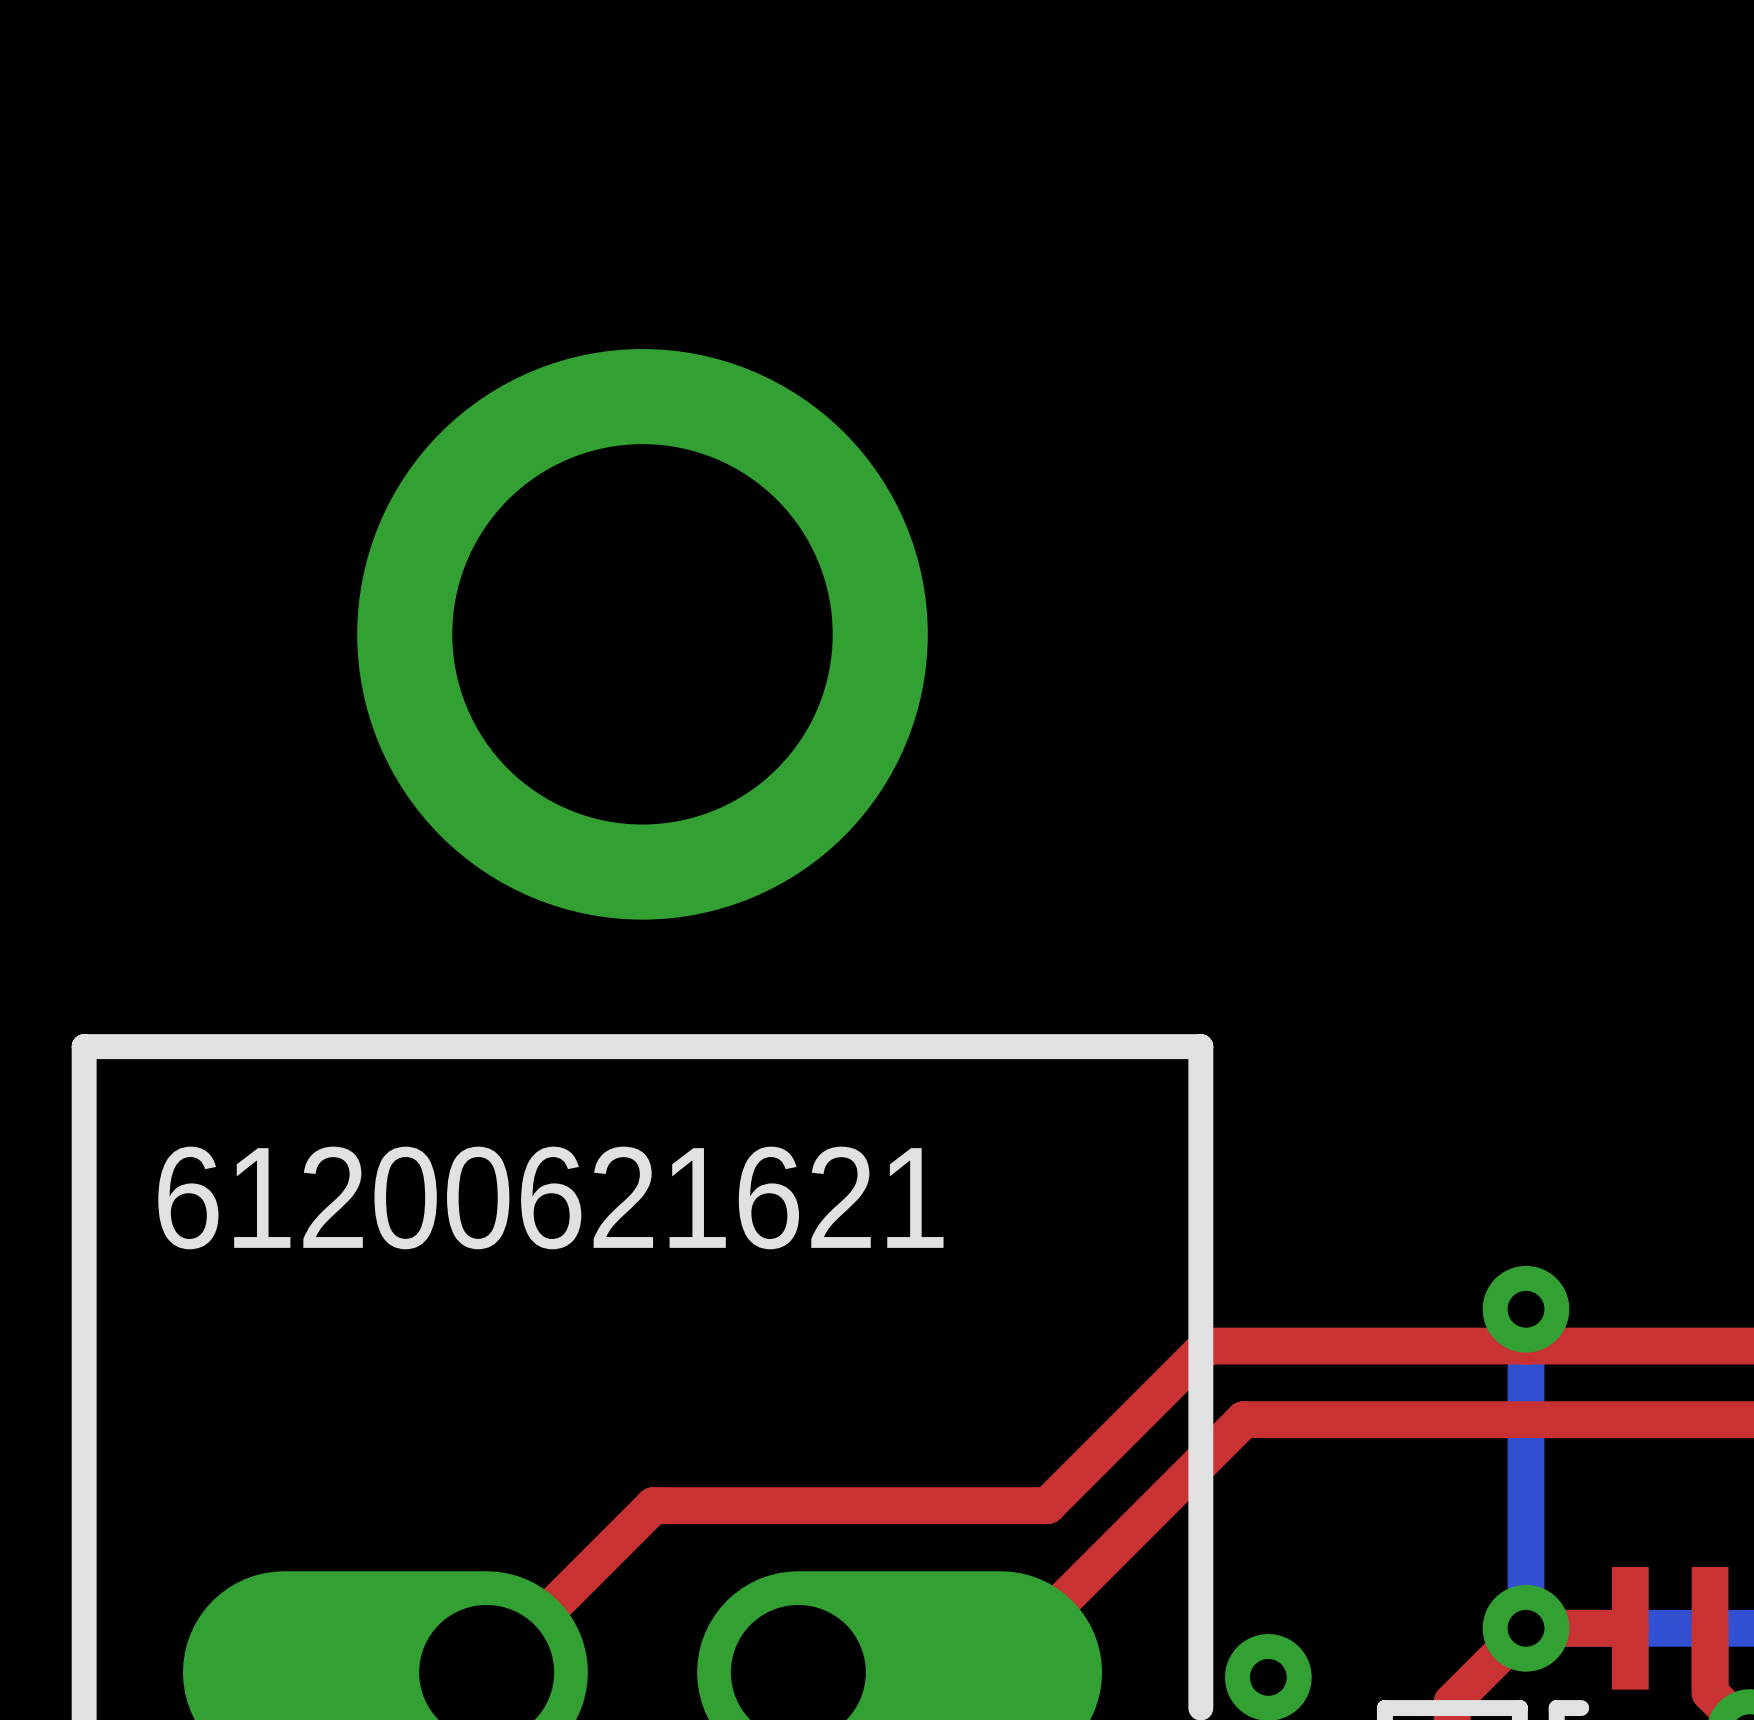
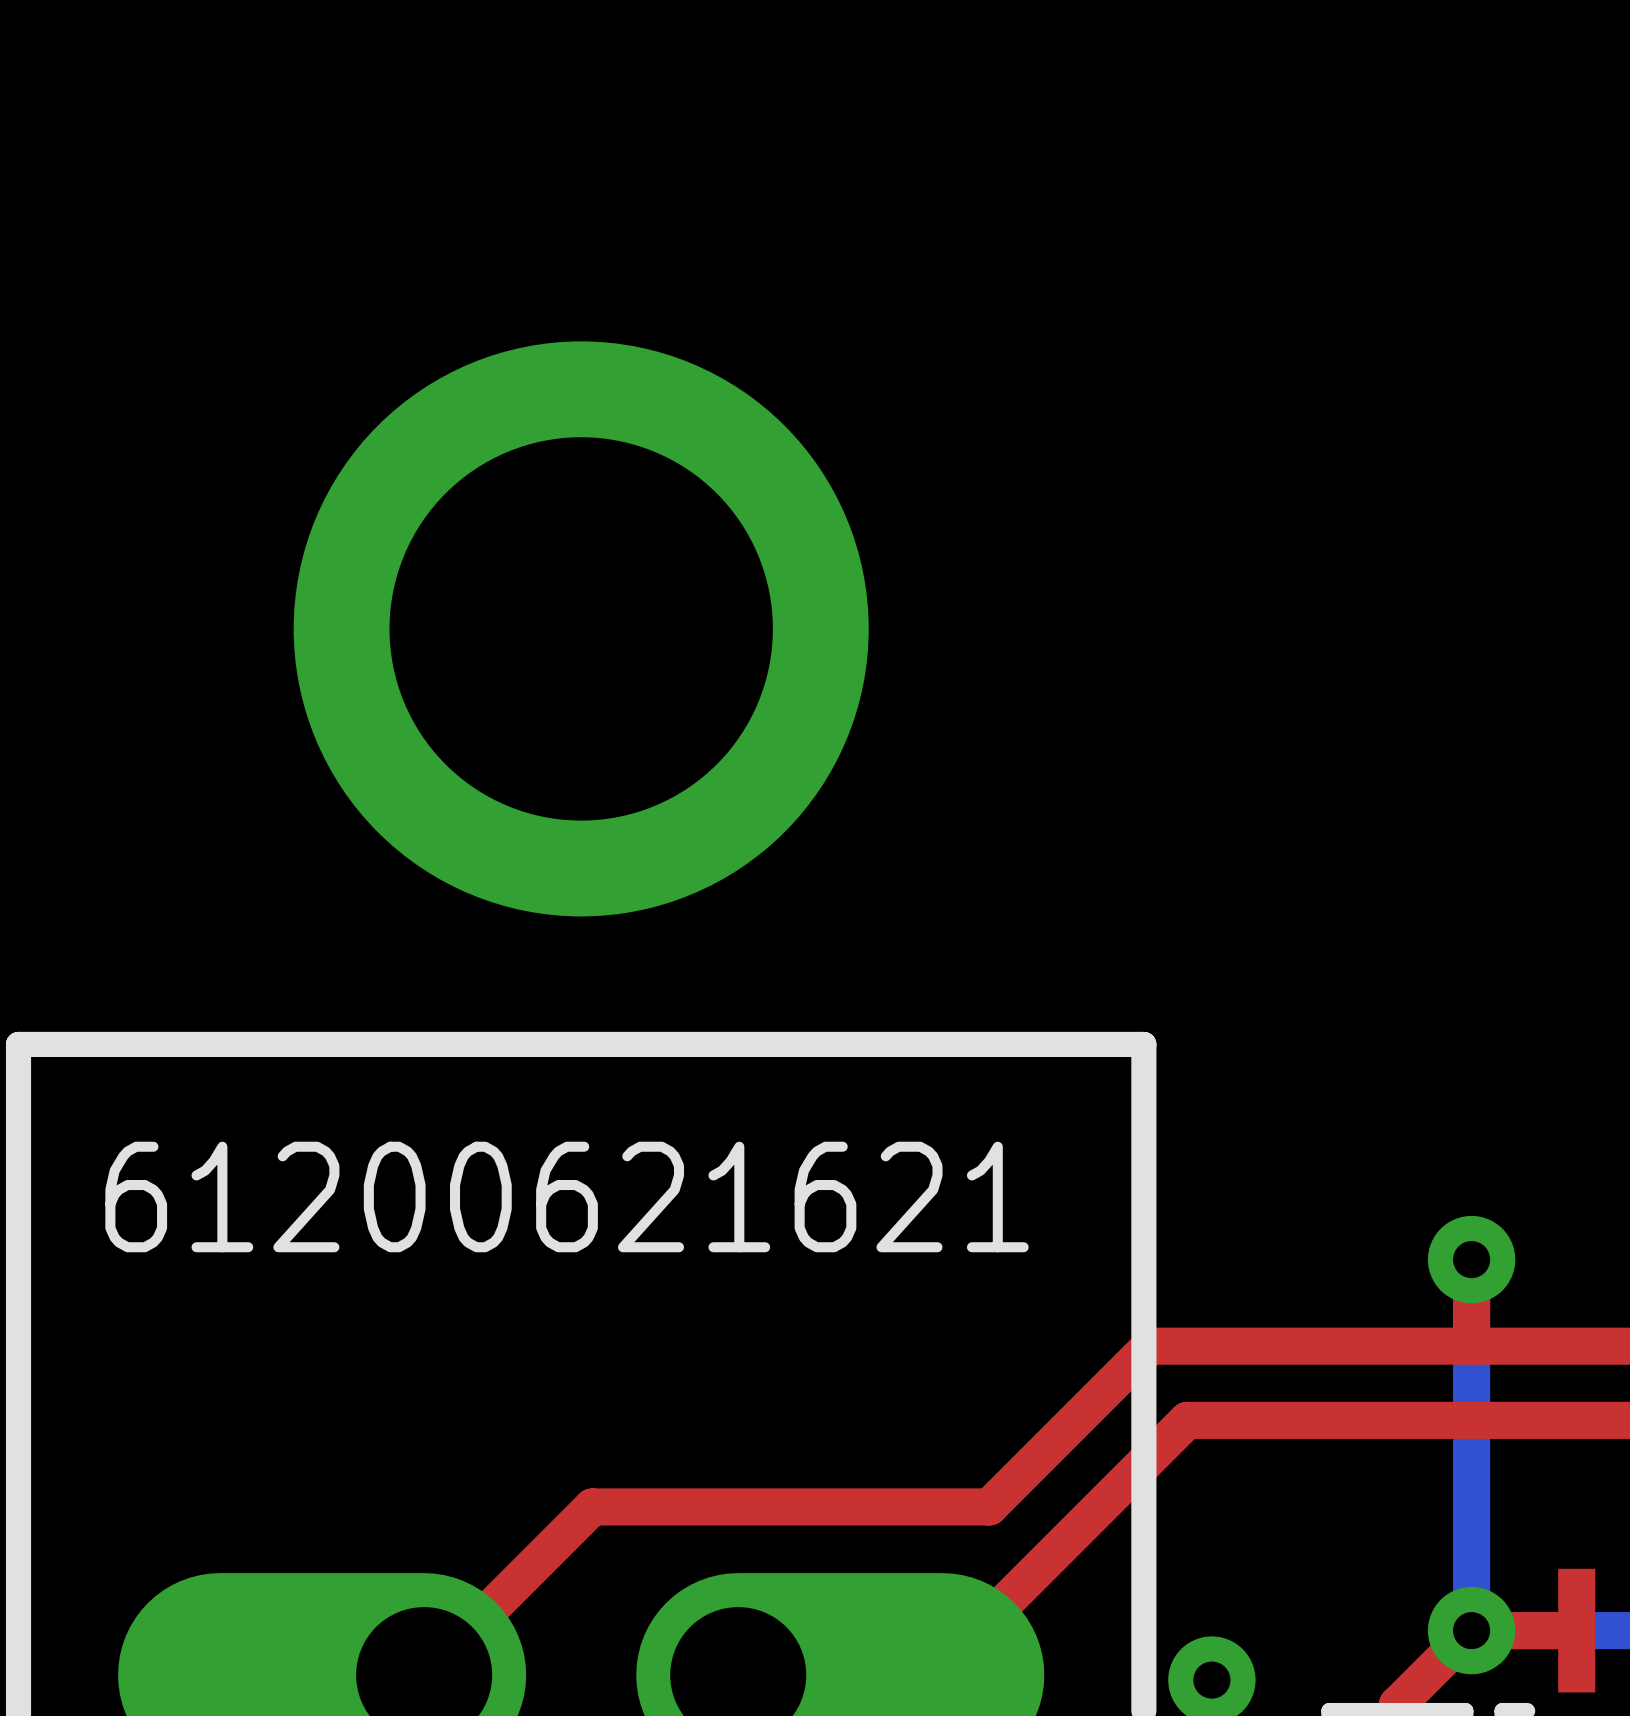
via position: (1526, 1309) -> (1471, 1259)

